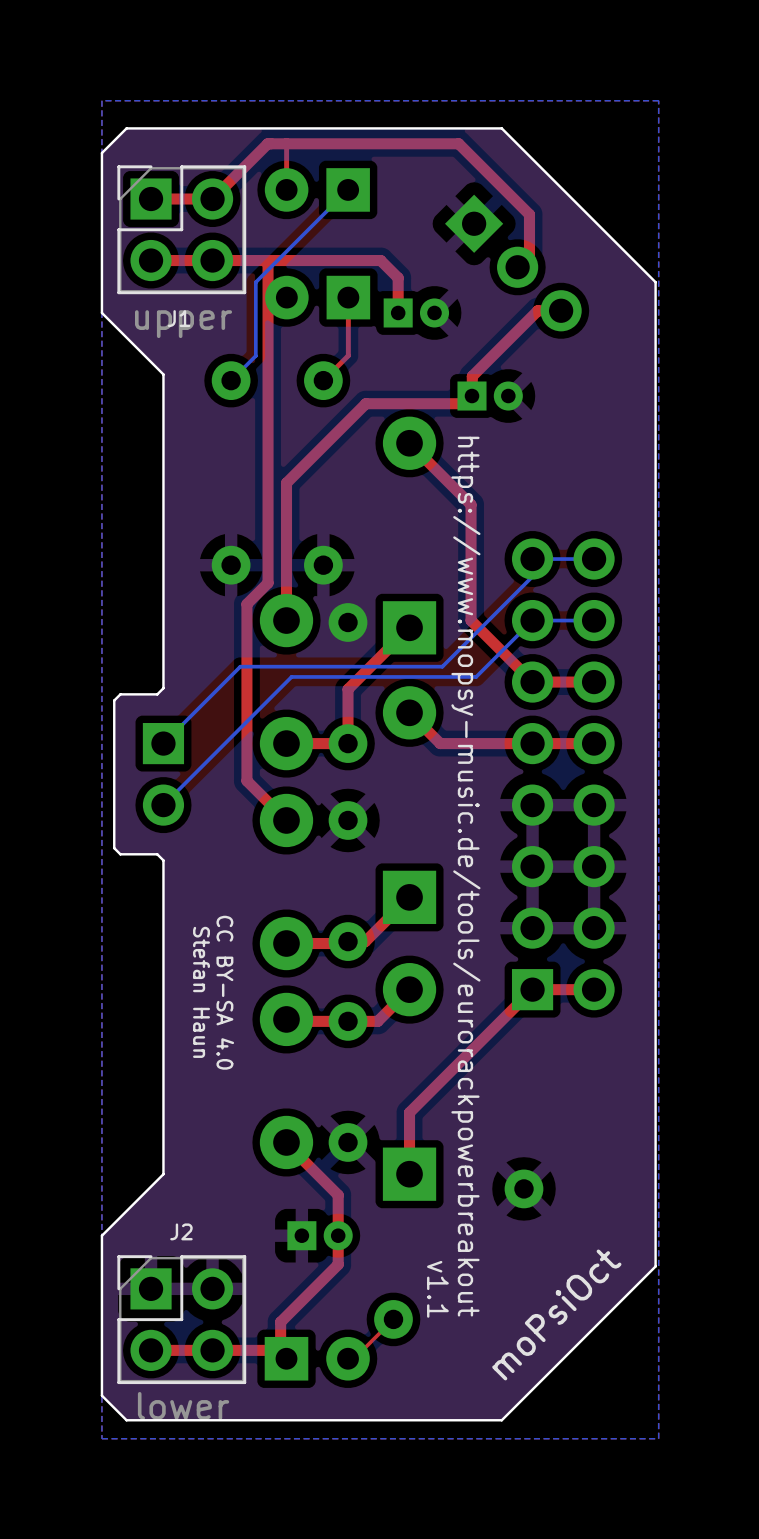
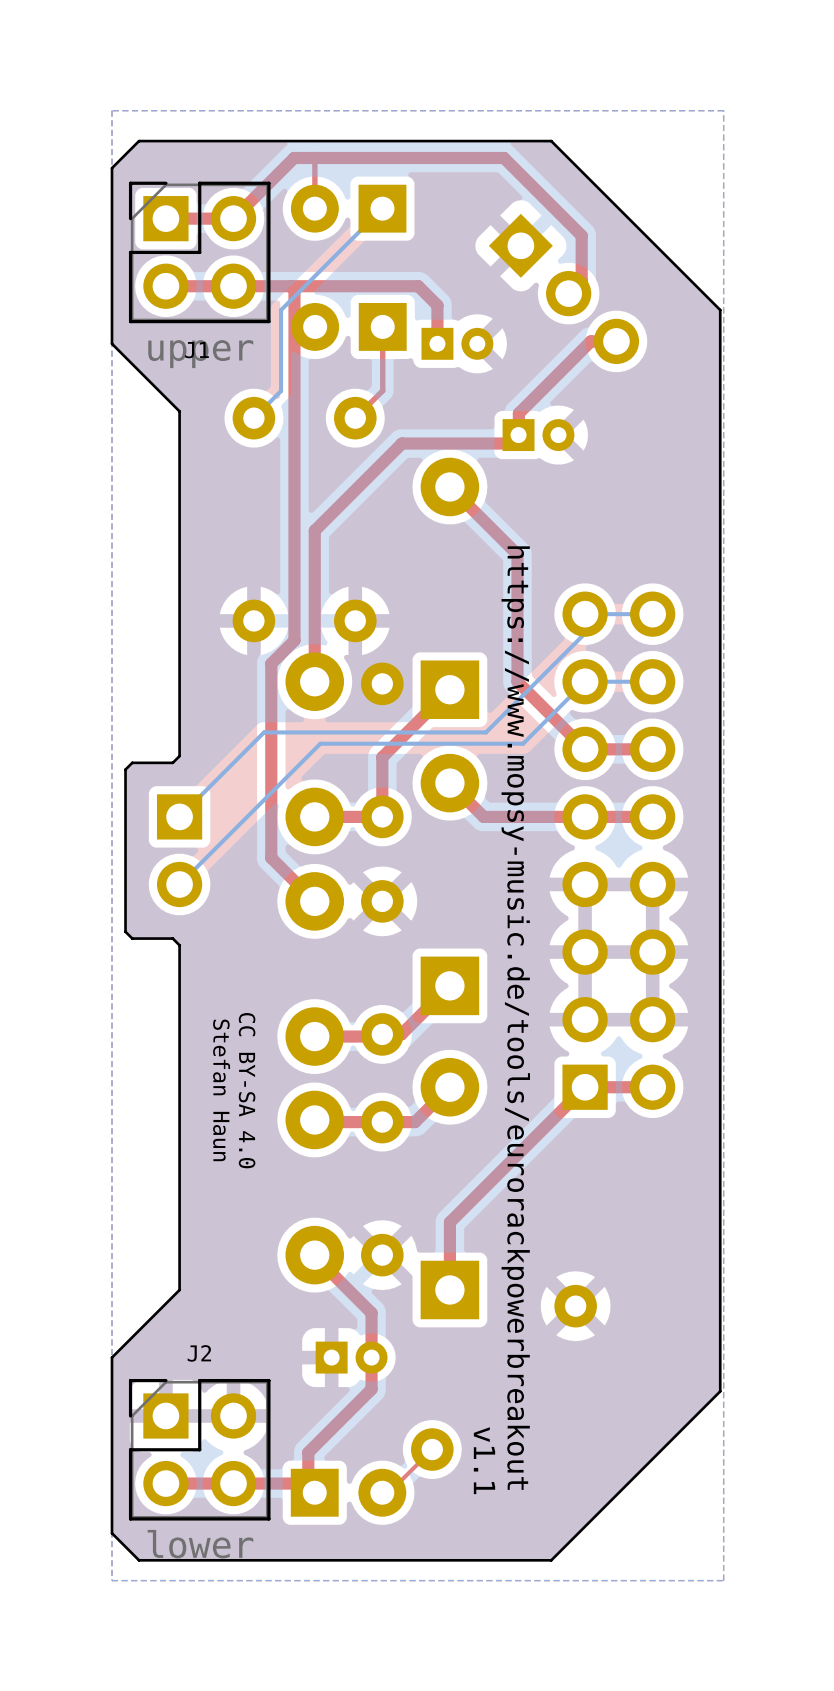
text position: https://www.mopsy-music.de/tools/eurorackpowerbreakout (465, 876) -> https://www.mopsy-music.de/tools/eurorackpowerbreakout (515, 1018)
text position: v1.1 (437, 1289) -> v1.1 (484, 1460)
text: moPsiOct (556, 1314) -> none

